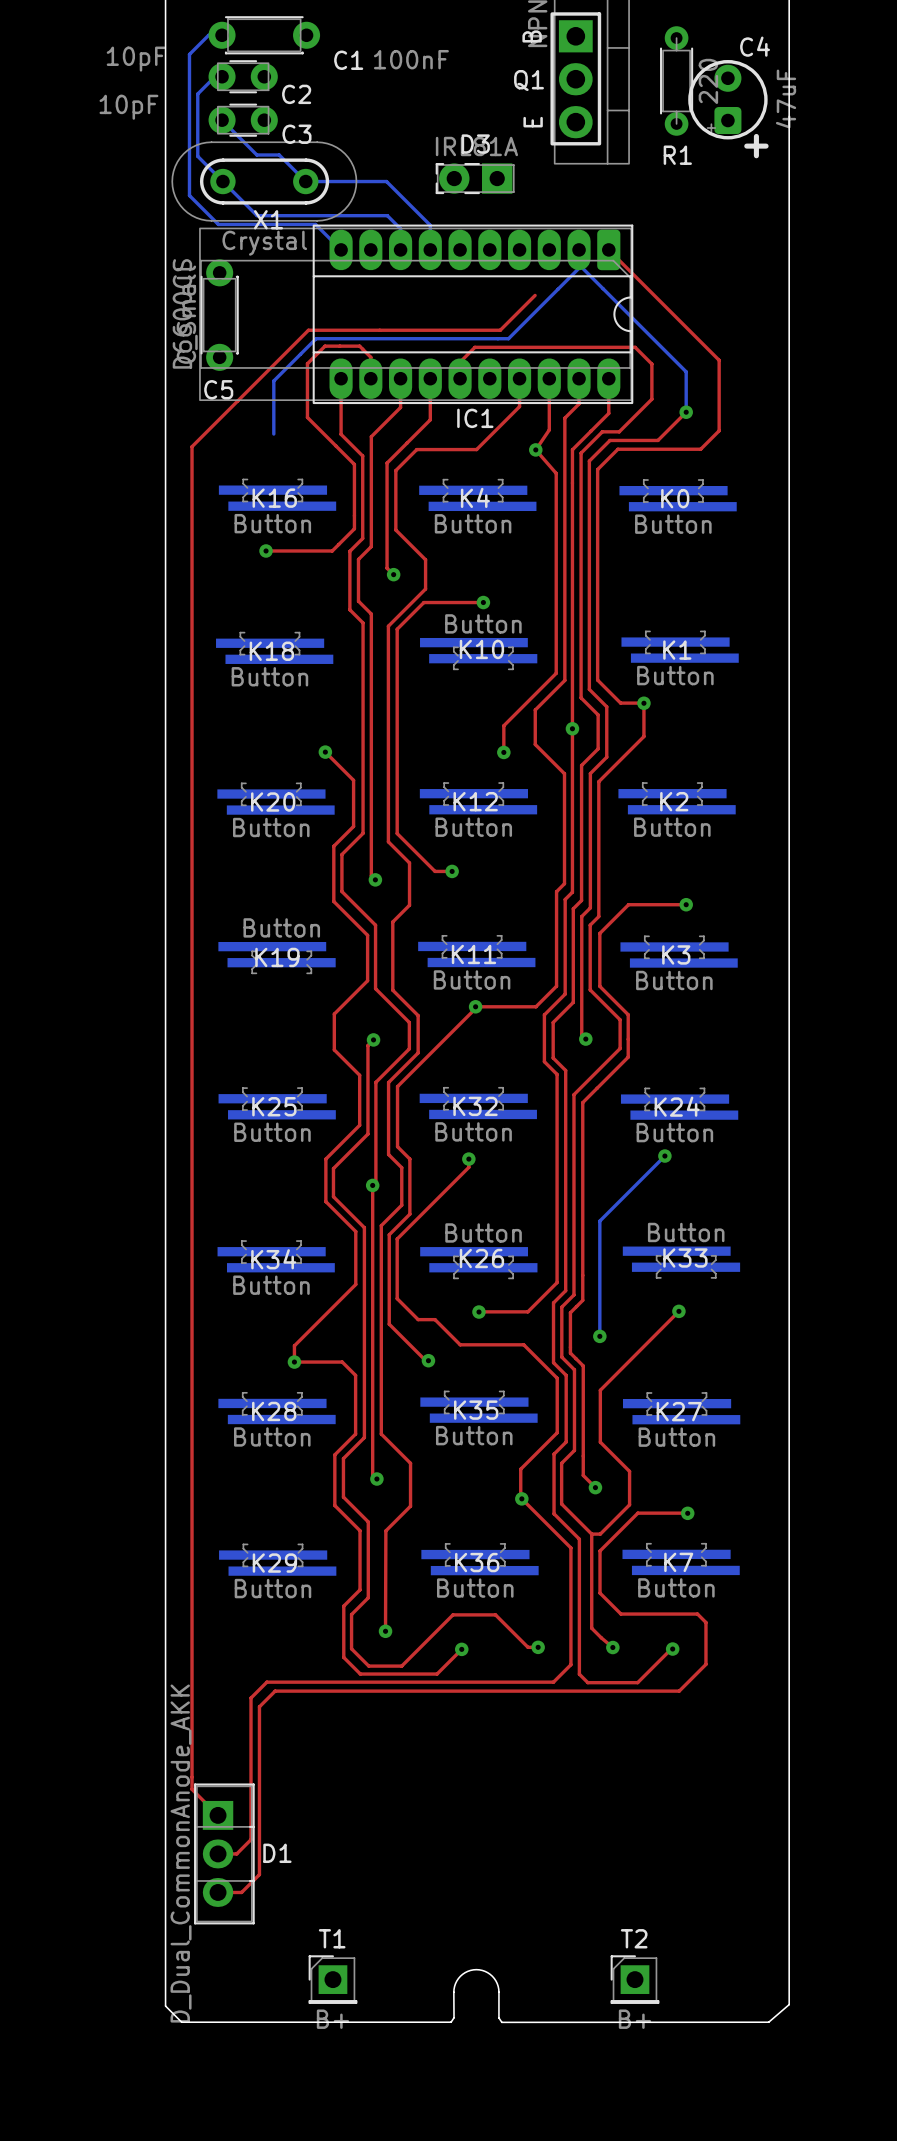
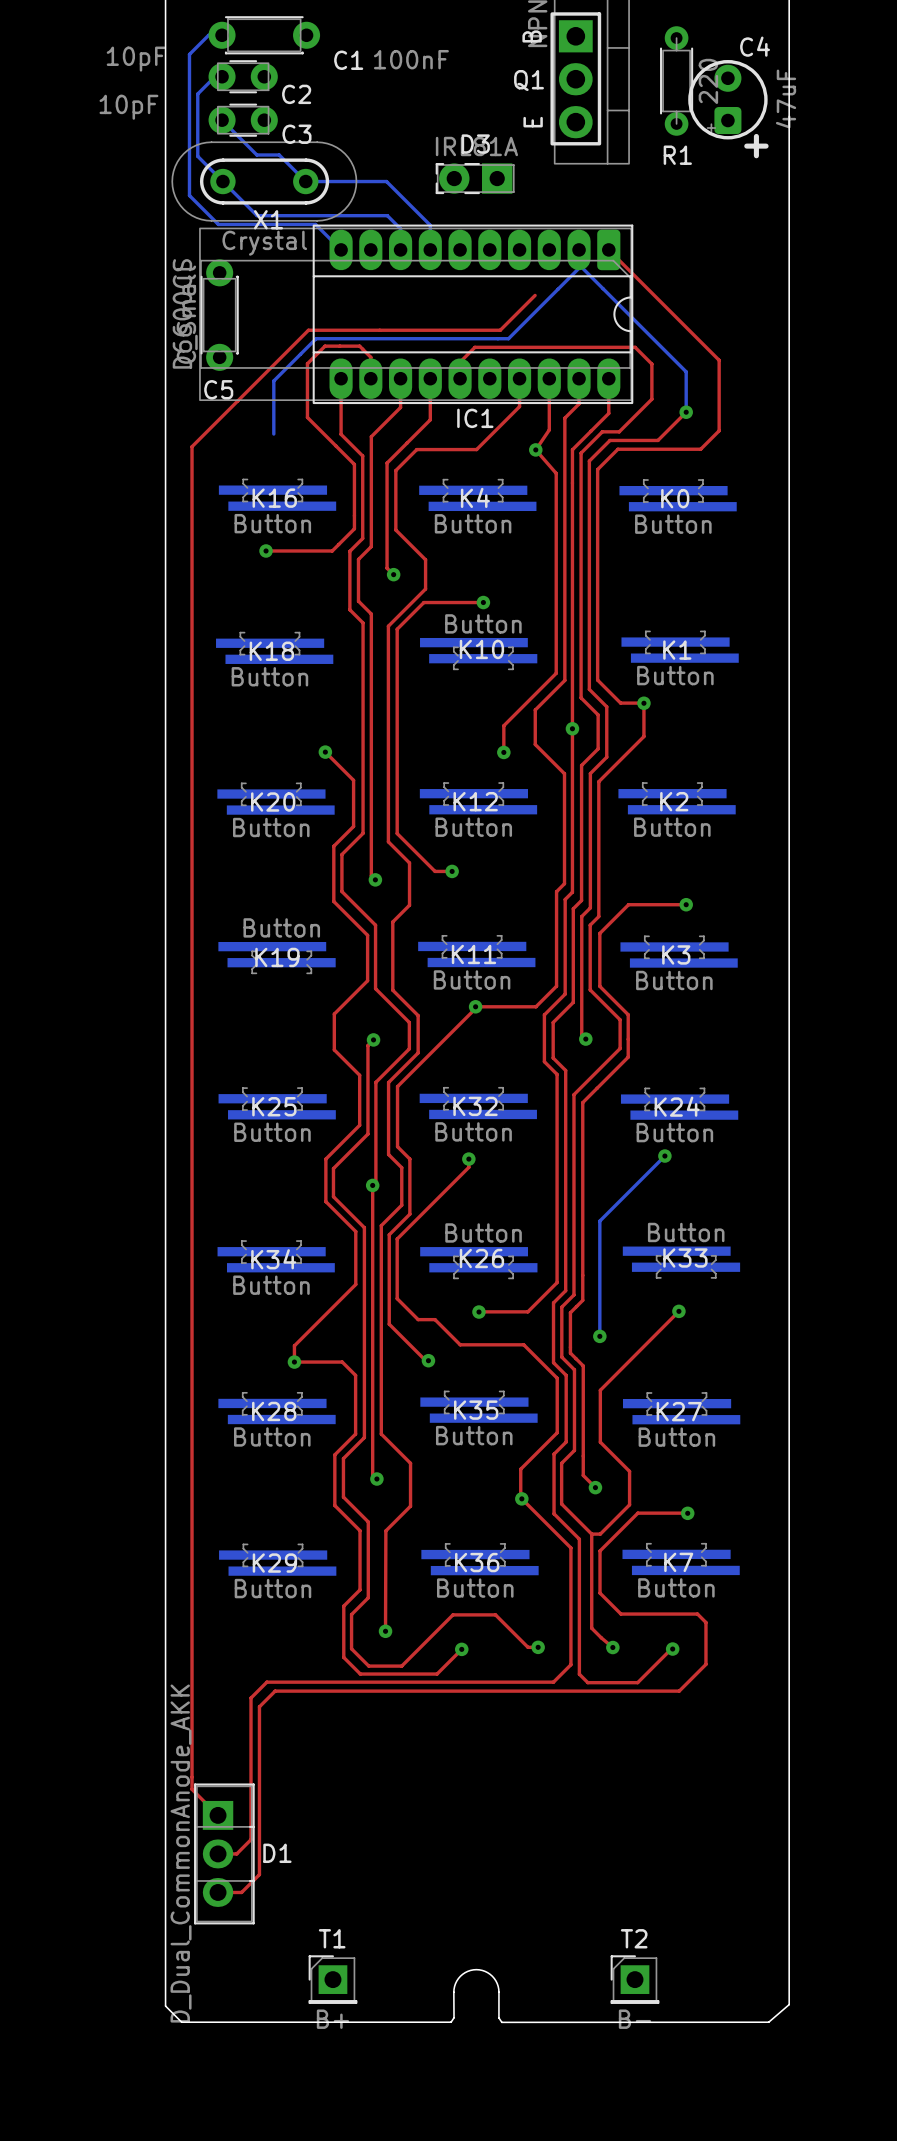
T2 value: B+ (634, 2019) -> B- (634, 2019)

